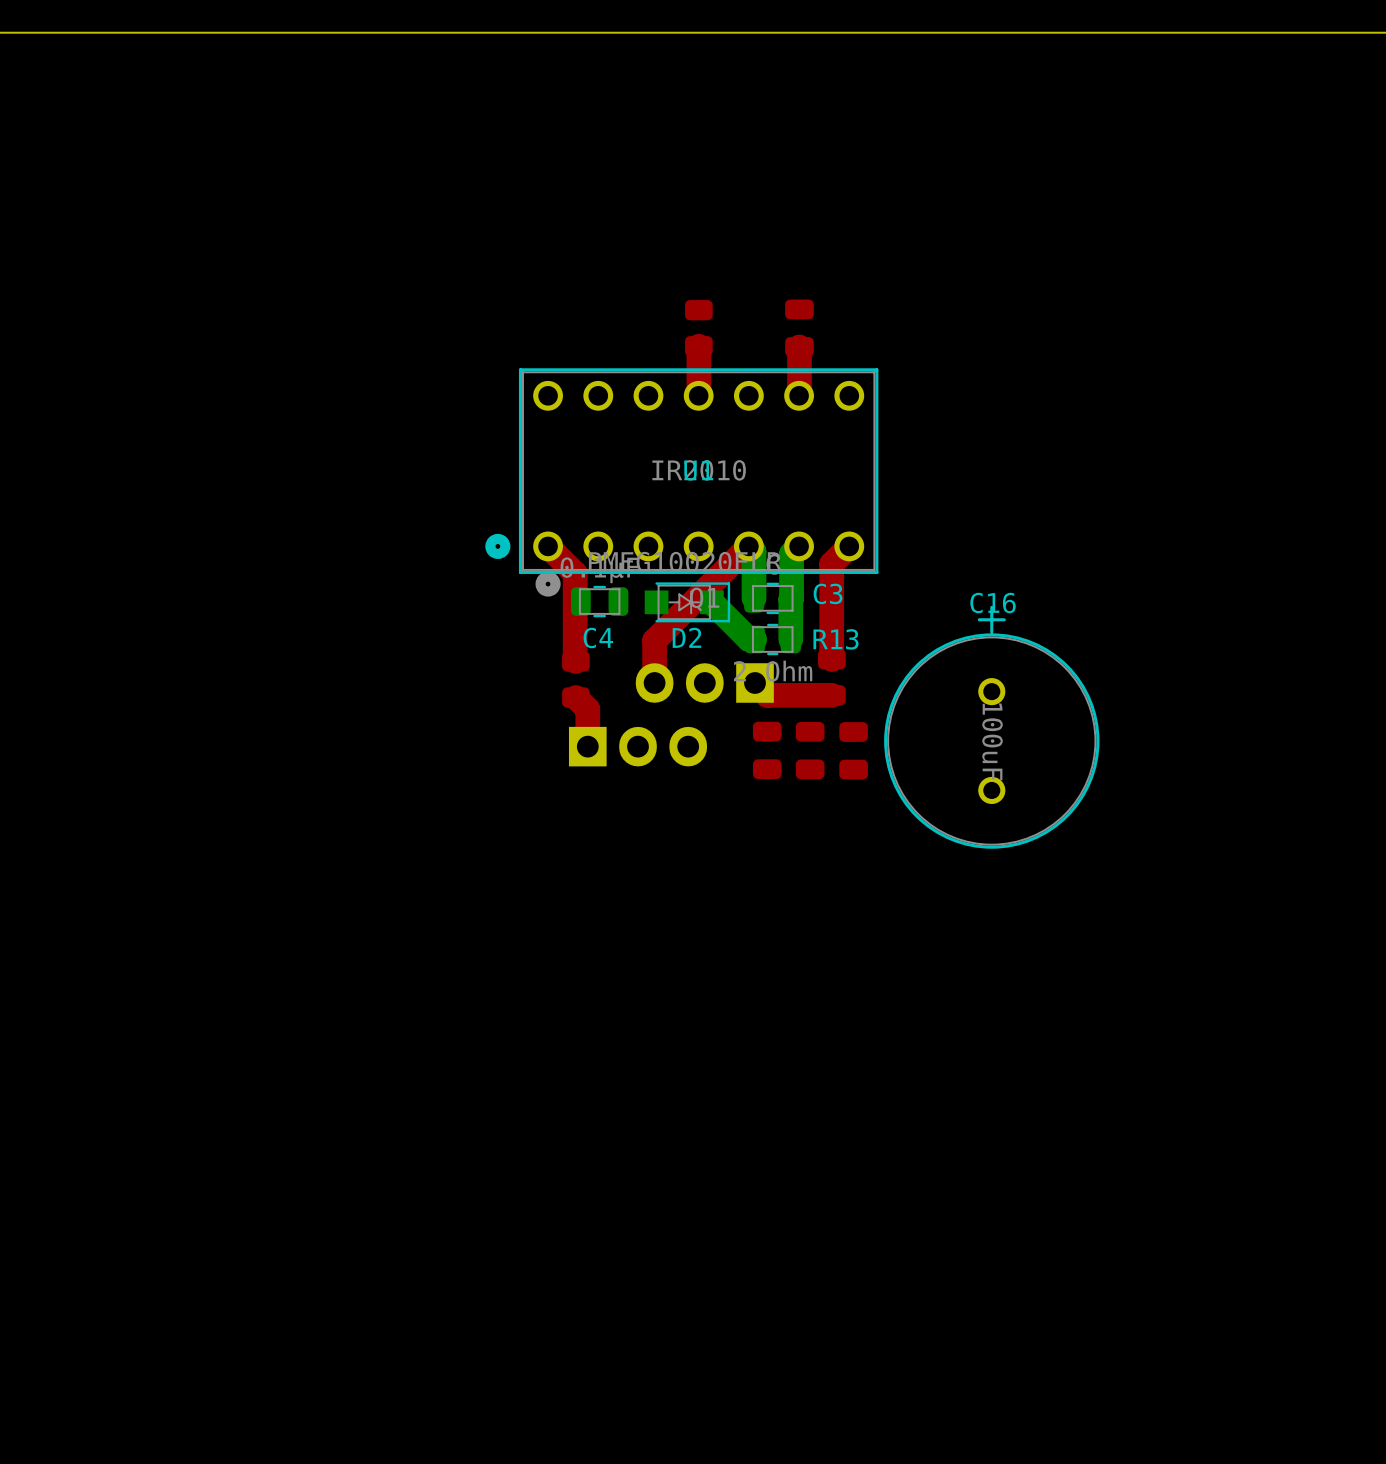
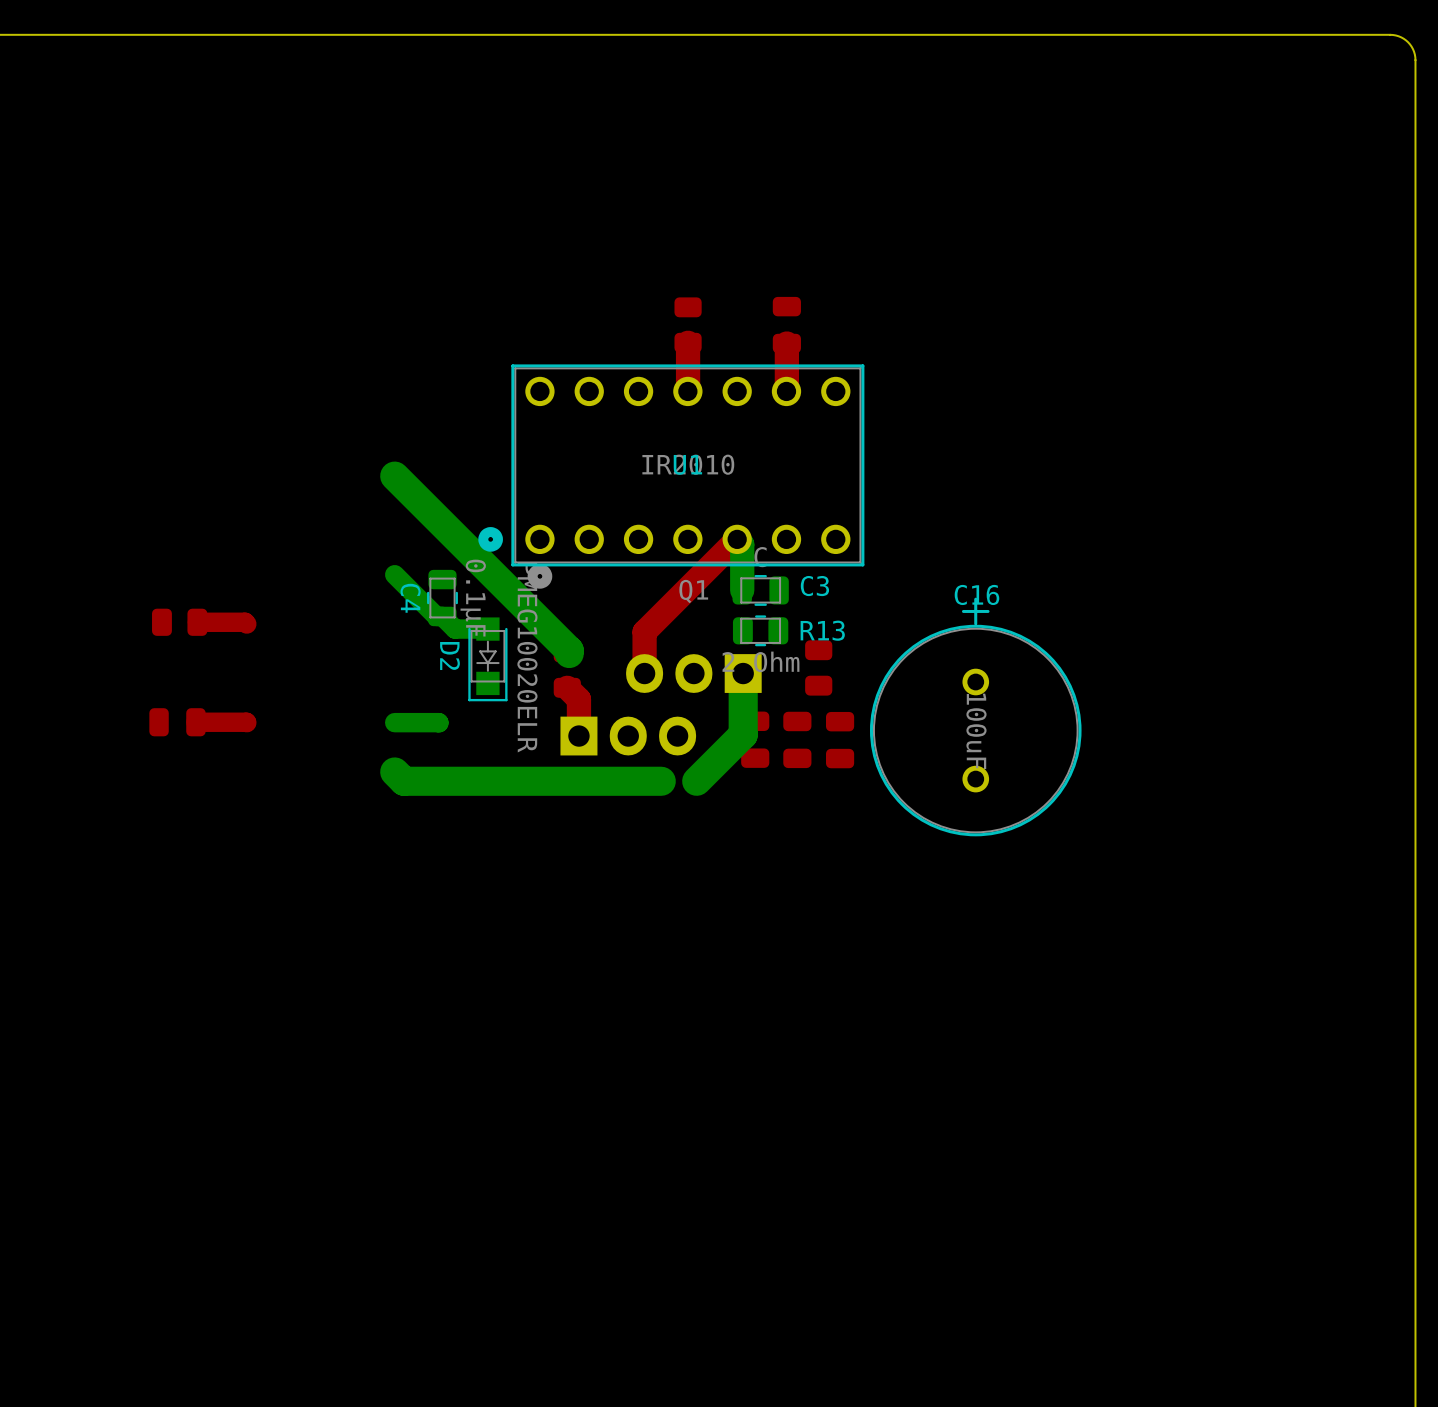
bottom track: none -> (394, 476) (569, 650) (569, 653)
top track: (548, 546) (575, 573) (575, 661) -> none
bottom track: (799, 546) (791, 553) (790, 639) -> none
top track: (849, 546) (831, 564) (831, 659) -> none
bottom track: none -> (394, 574) (436, 616) (442, 616) (455, 629) (487, 629)
C4 rotation: 0° (599, 601) -> 90° clockwise (442, 598)
C4 position: (599, 601) -> (442, 598)
D2 rotation: 0° (687, 602) -> 90° clockwise (487, 659)
D2 position: (687, 602) -> (487, 659)
bottom track: (711, 602) (749, 639) (754, 639) -> none
part: none -> (179, 622)
top track: none -> (197, 622) (245, 622) (246, 624)
top track: (755, 682) (767, 695) (831, 695) -> none
bottom track: none -> (743, 673) (743, 734) (696, 781)
part: none -> (177, 722)
top track: none -> (195, 722) (246, 722)
bottom track: none -> (438, 722) (394, 722)
bottom track: none -> (394, 771) (404, 781) (661, 781)

